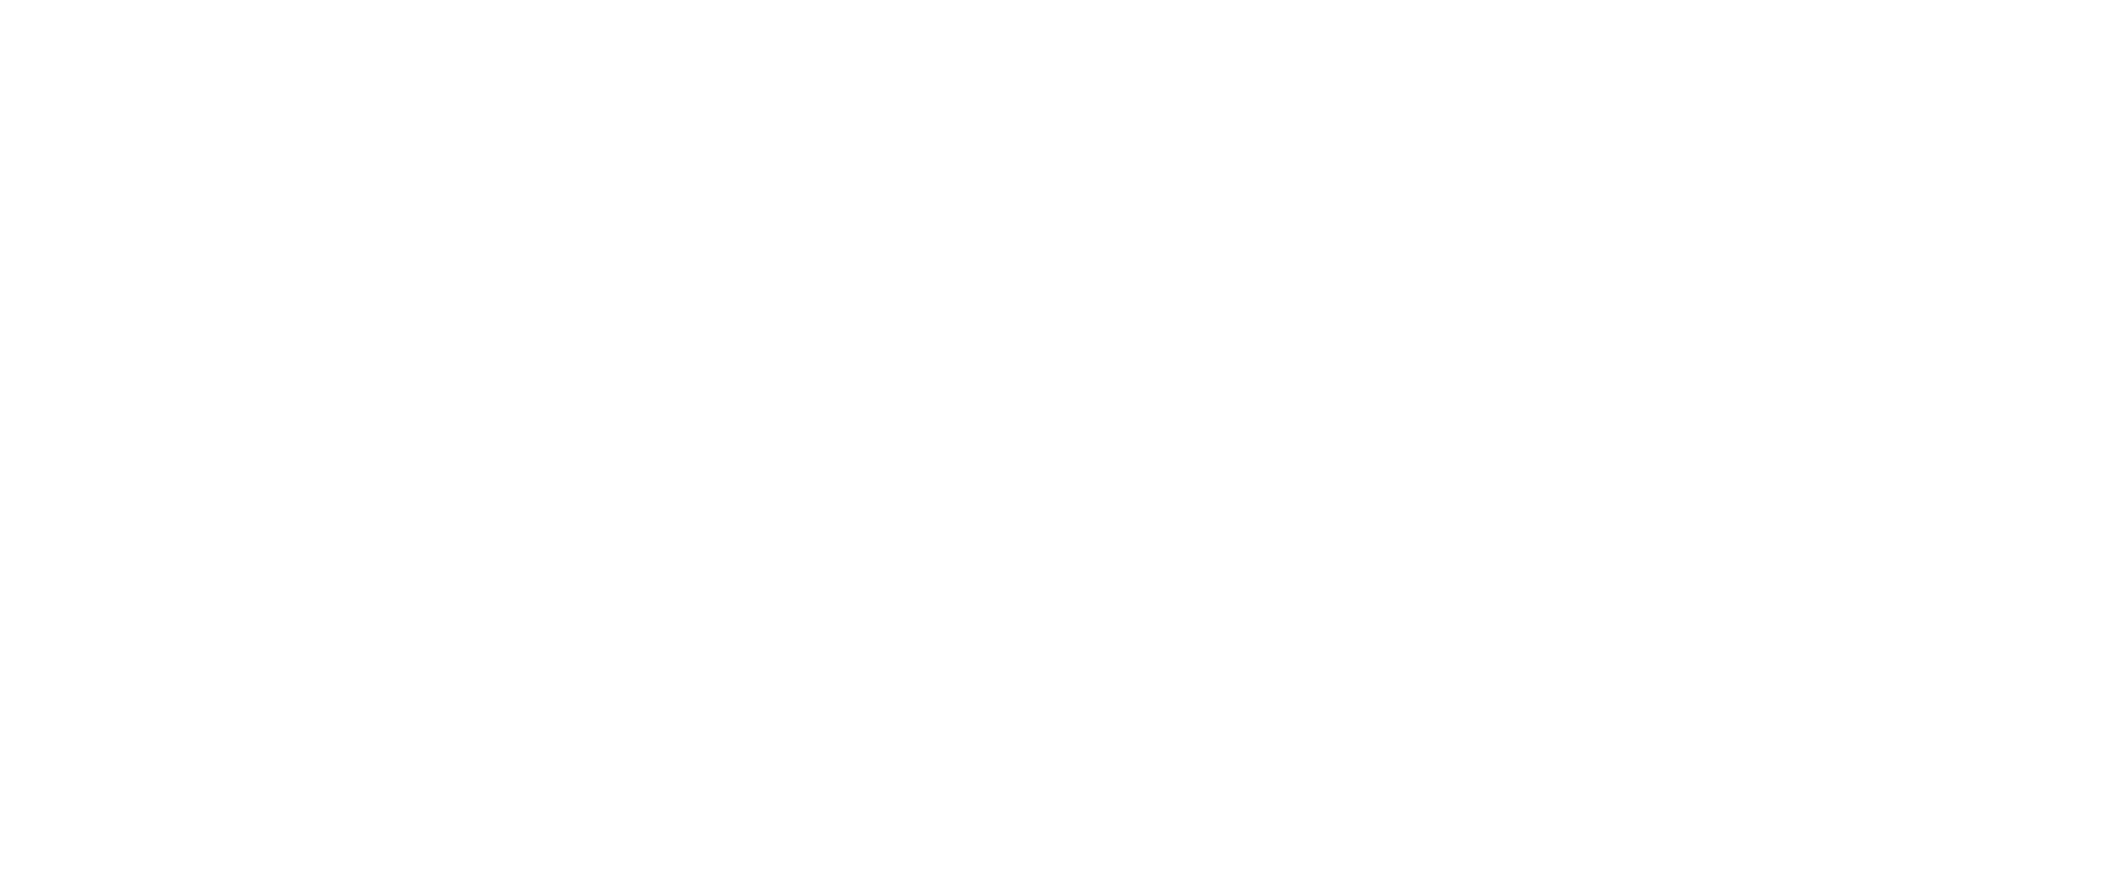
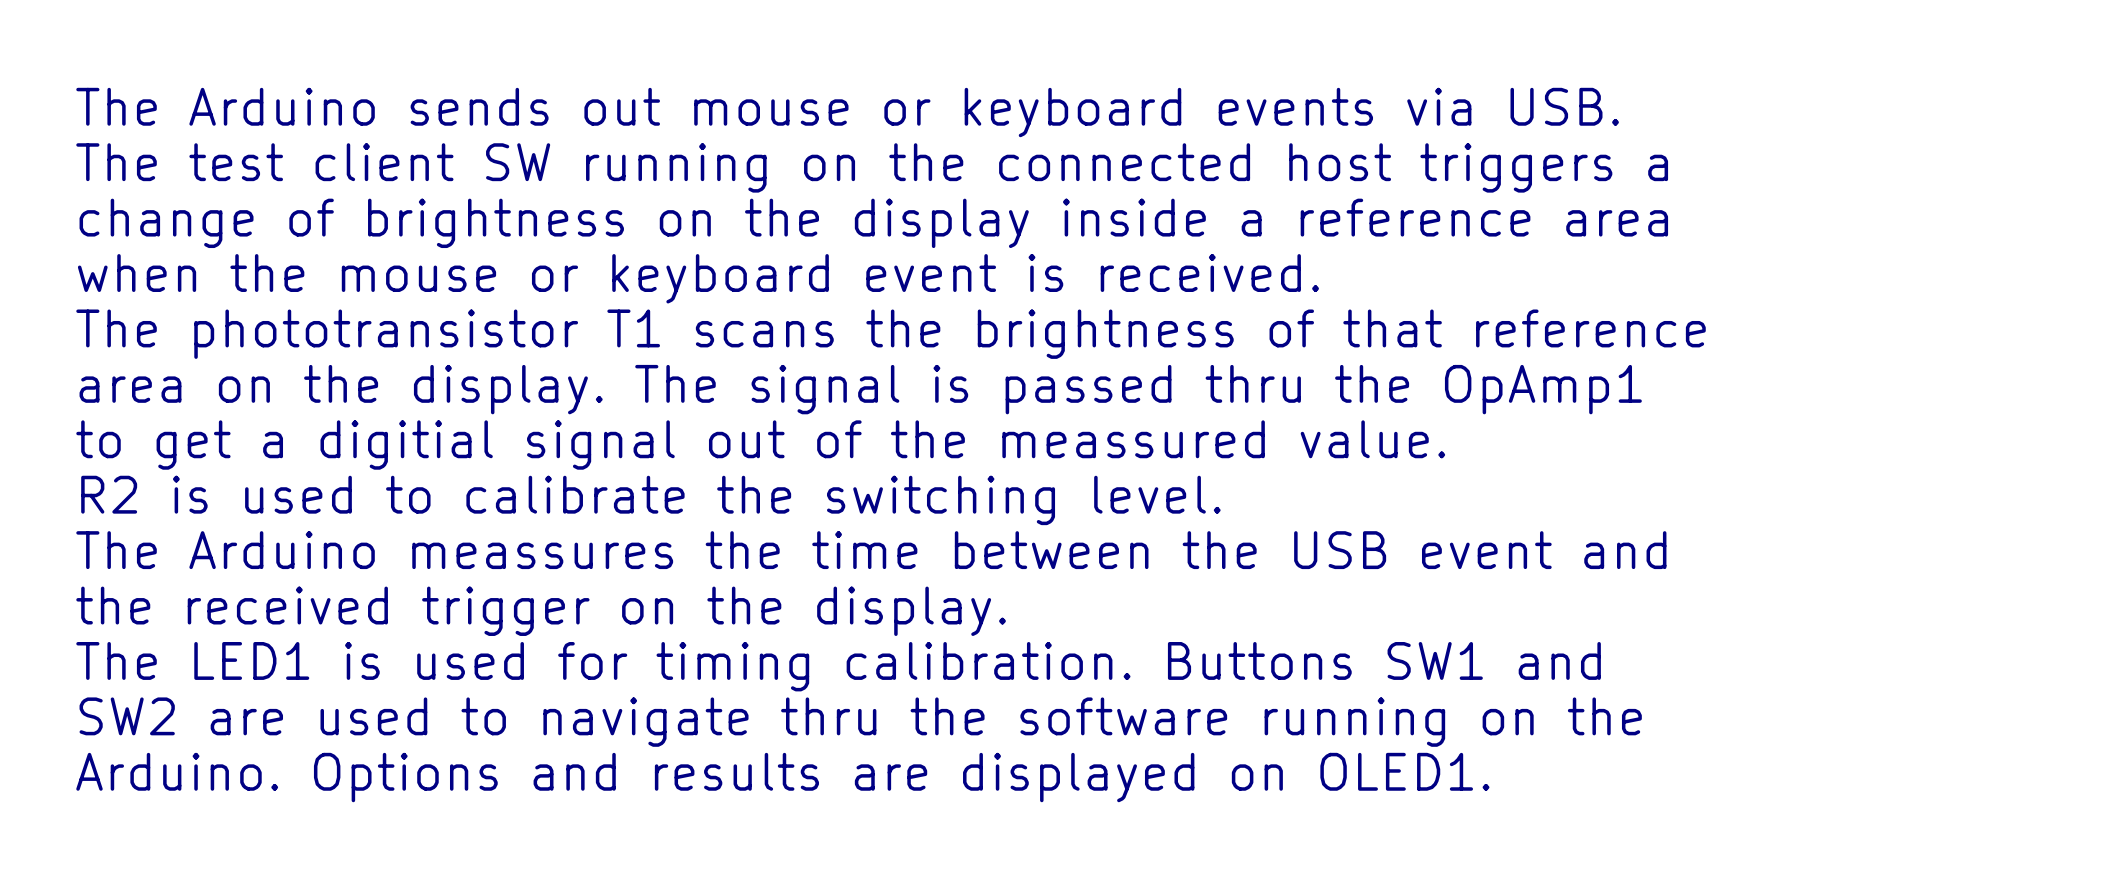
text: none -> The Arduino sends out mouse or keyboard events via USB. (847, 112)
text: none -> The test client SW running on the connected host triggers a (872, 167)
text: none -> change of brightness on the display inside a reference area (873, 223)
text: none -> when the mouse or keyboard event is received. (698, 278)
text: none -> The phototransistor T1 scans the brightness of that reference (891, 334)
text: none -> area on the display. The signal is passed thru the OpAmp1 (860, 389)
text: none -> to get a digitial signal out of the meassured value. (760, 445)
text: none -> R2 is used to calibrate the switching level. (650, 500)
text: none -> The Arduino meassures the time between the USB event and (871, 550)
text: none -> the received trigger on the display. (541, 611)
text: none -> The LED1 is used for timing calibration. Buttons SW1 and (838, 666)
text: none -> SW2 are used to navigate thru the software running on the (860, 722)
text: none -> Arduino. Options and results are displayed on OLED1. (782, 777)

